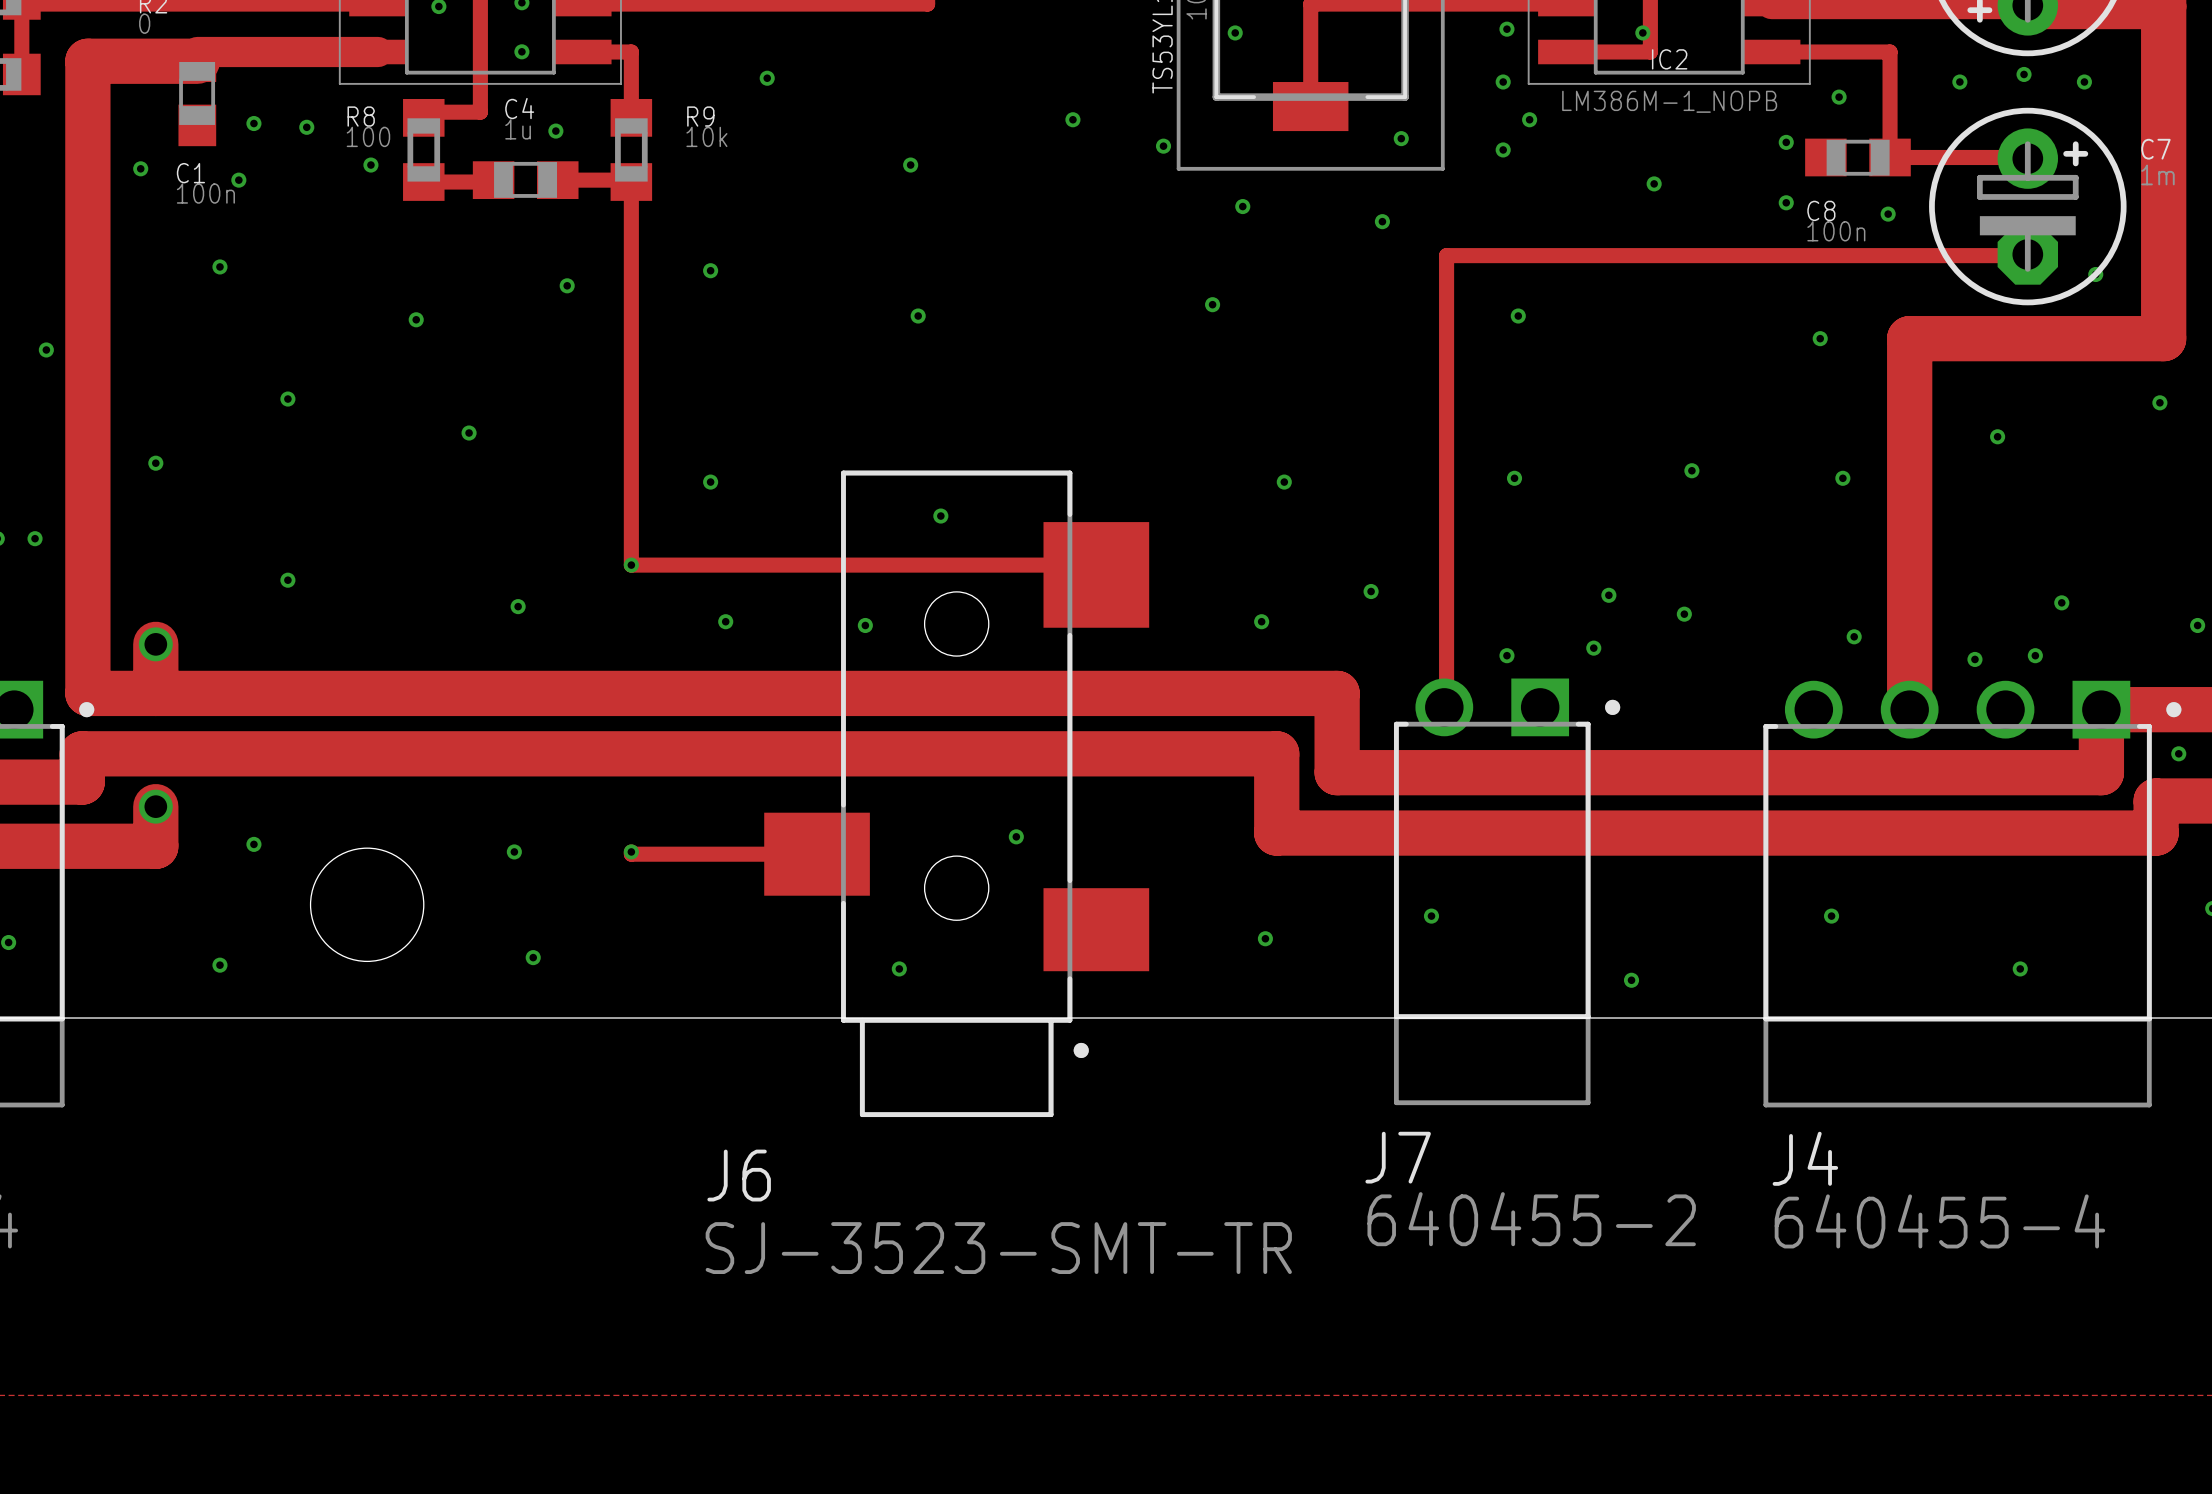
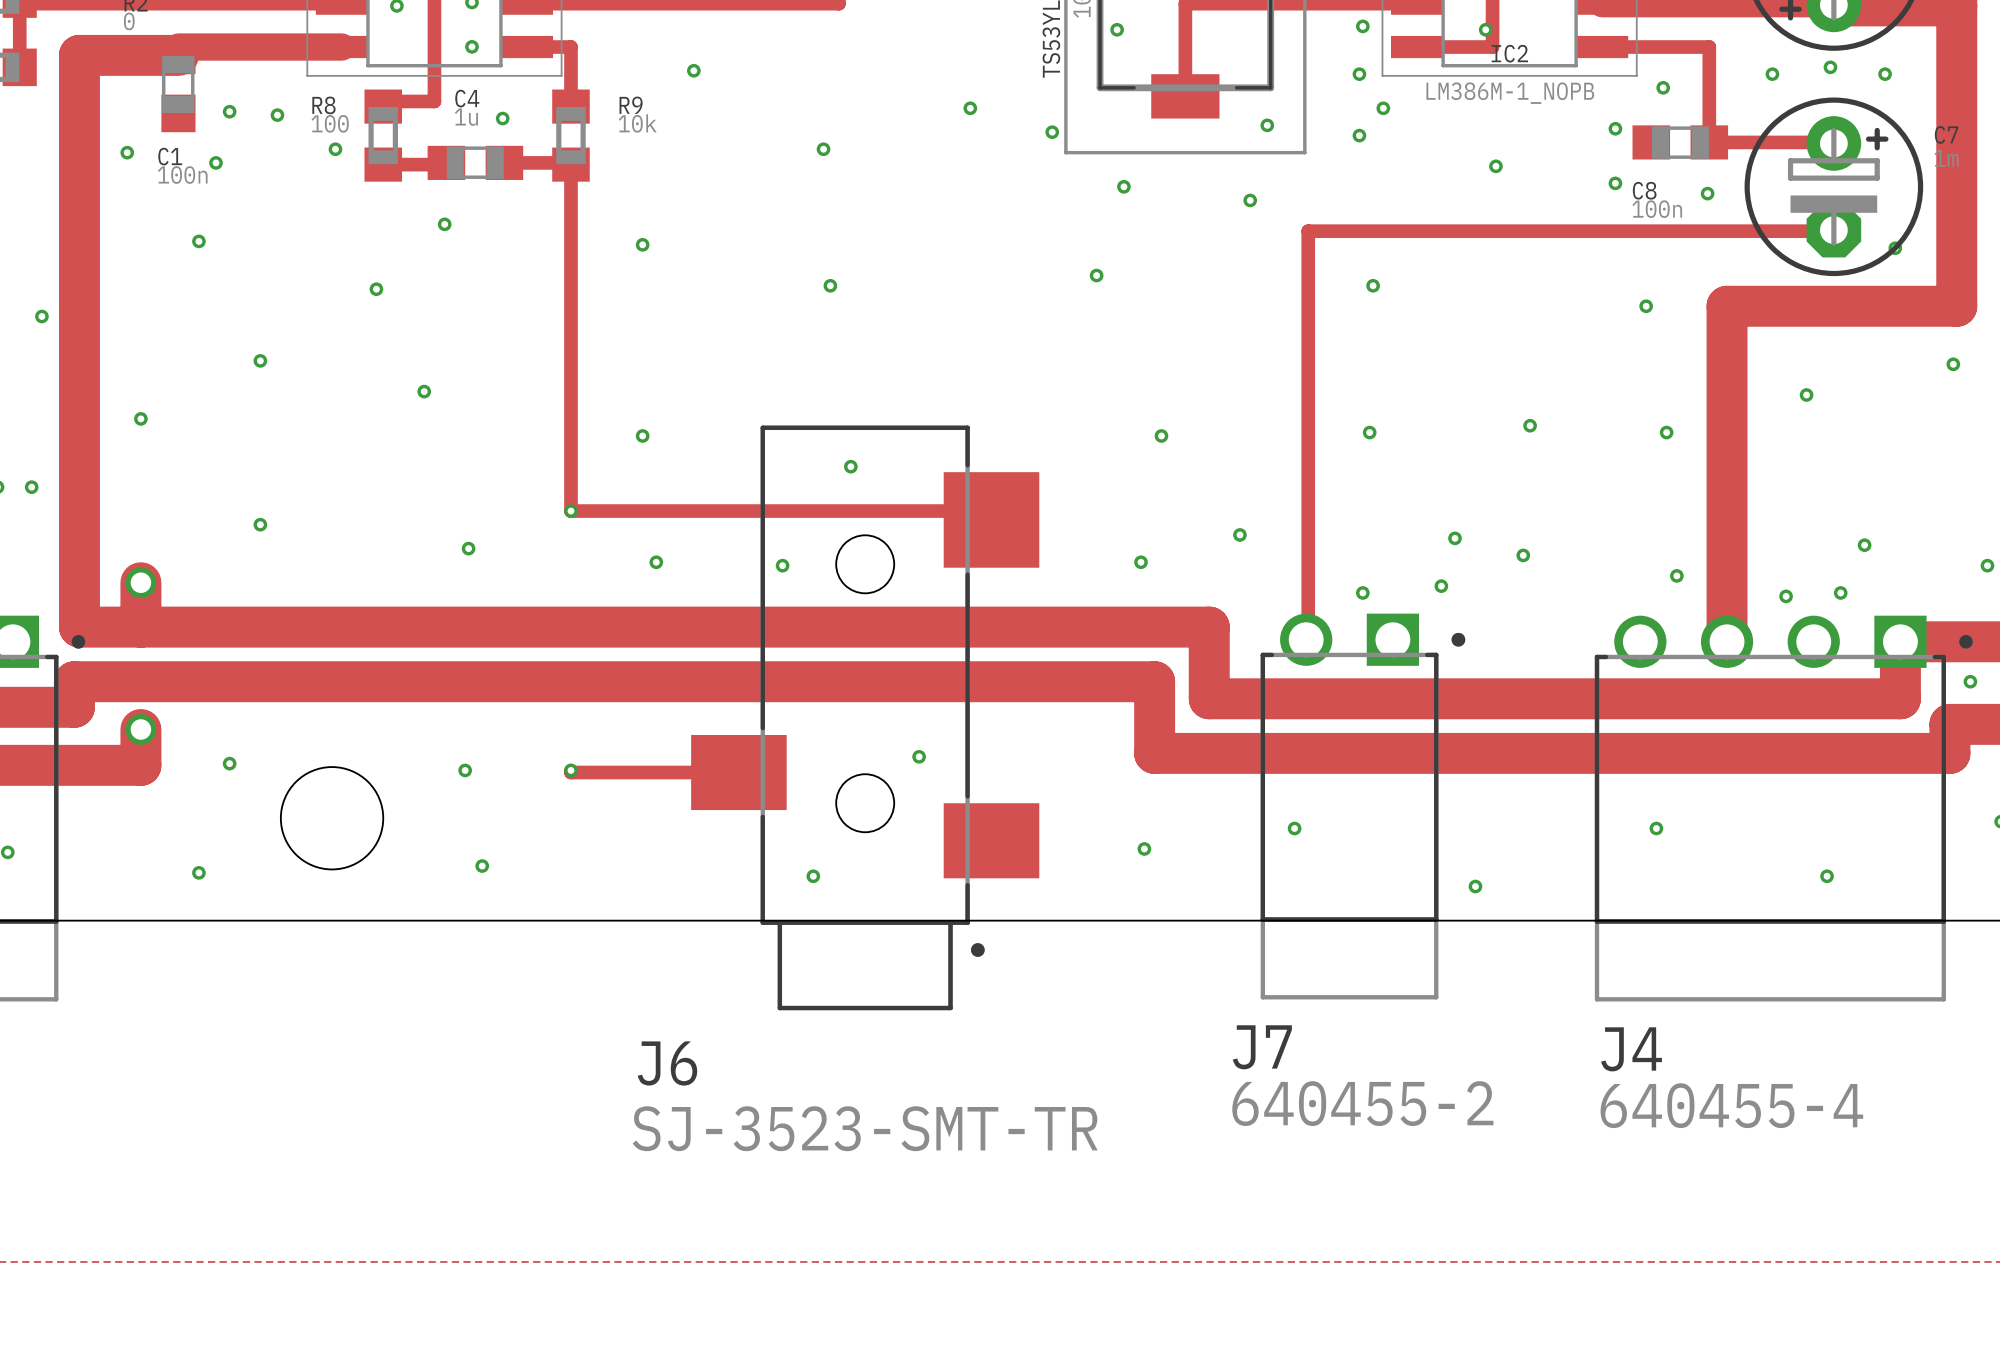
via position: (567, 285) -> (444, 224)

